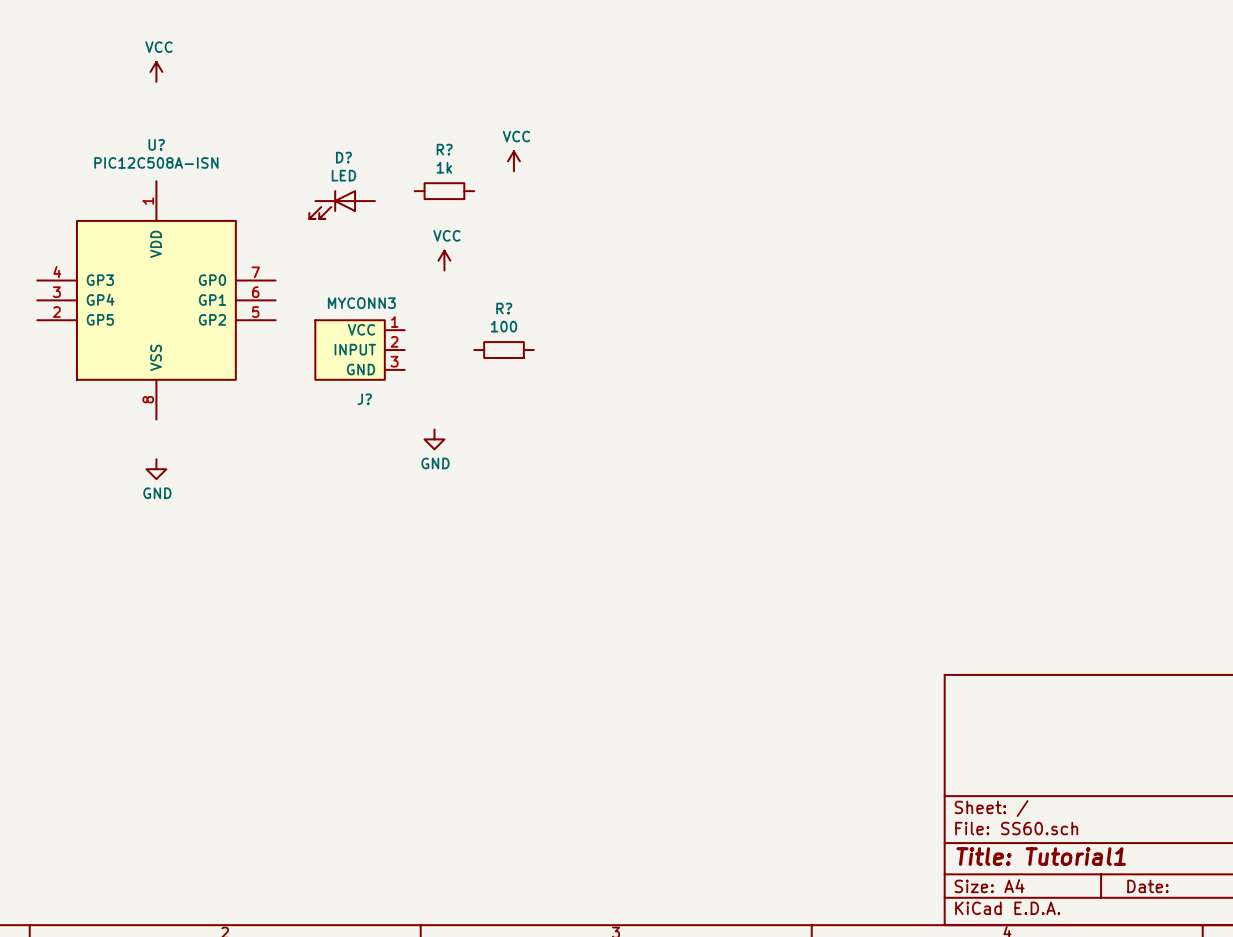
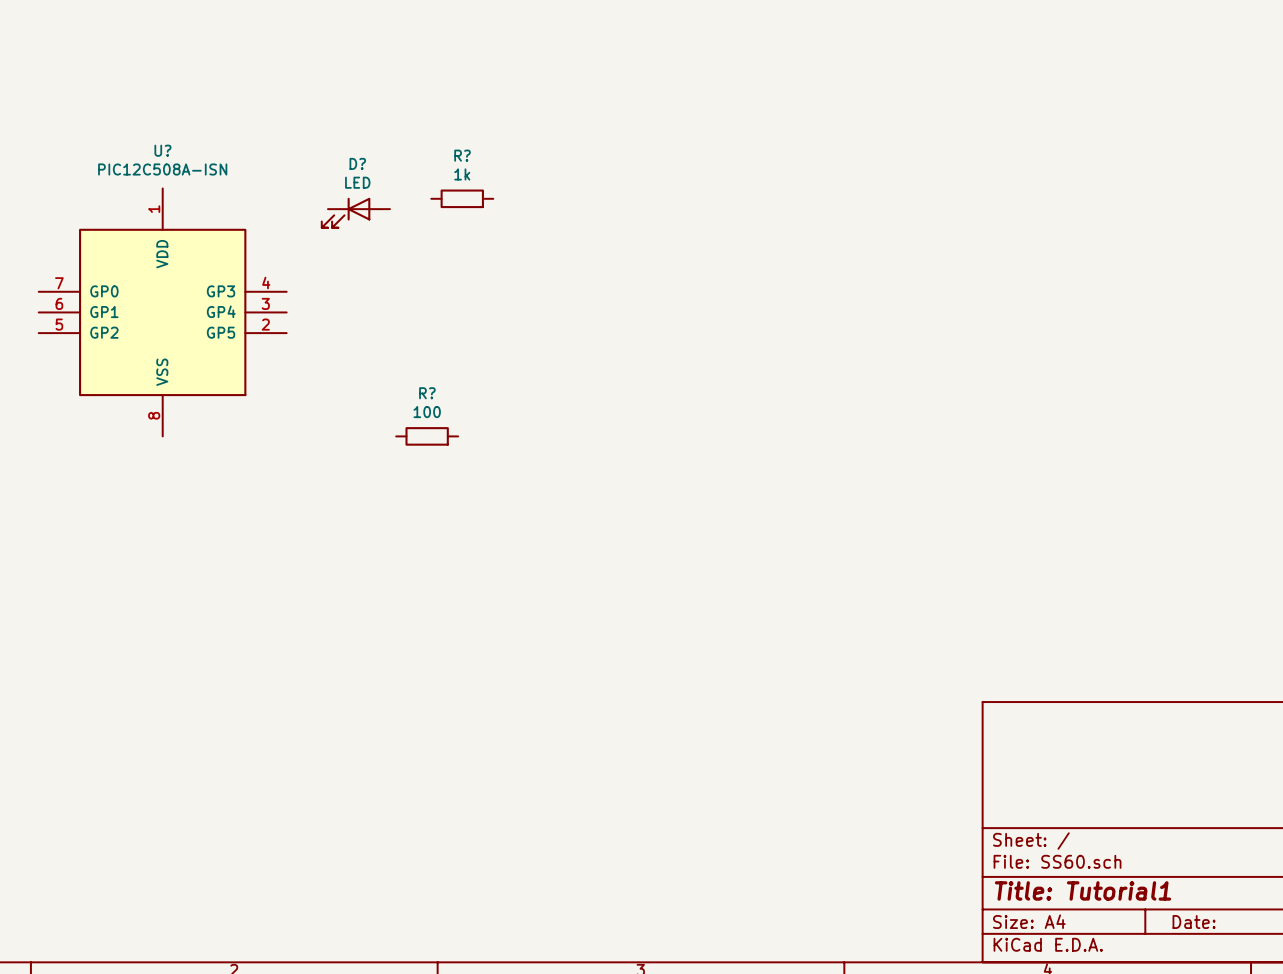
power symbol: VCC (156, 71) -> none
power symbol: VCC (513, 161) -> none
power symbol: VCC (444, 260) -> none
U? flip: as is (156, 300) -> left-right (162, 312)
J?: MYCONN3 (360, 350) -> none
R? position: (504, 350) -> (427, 436)
power symbol: GND (434, 439) -> none
power symbol: GND (156, 469) -> none

